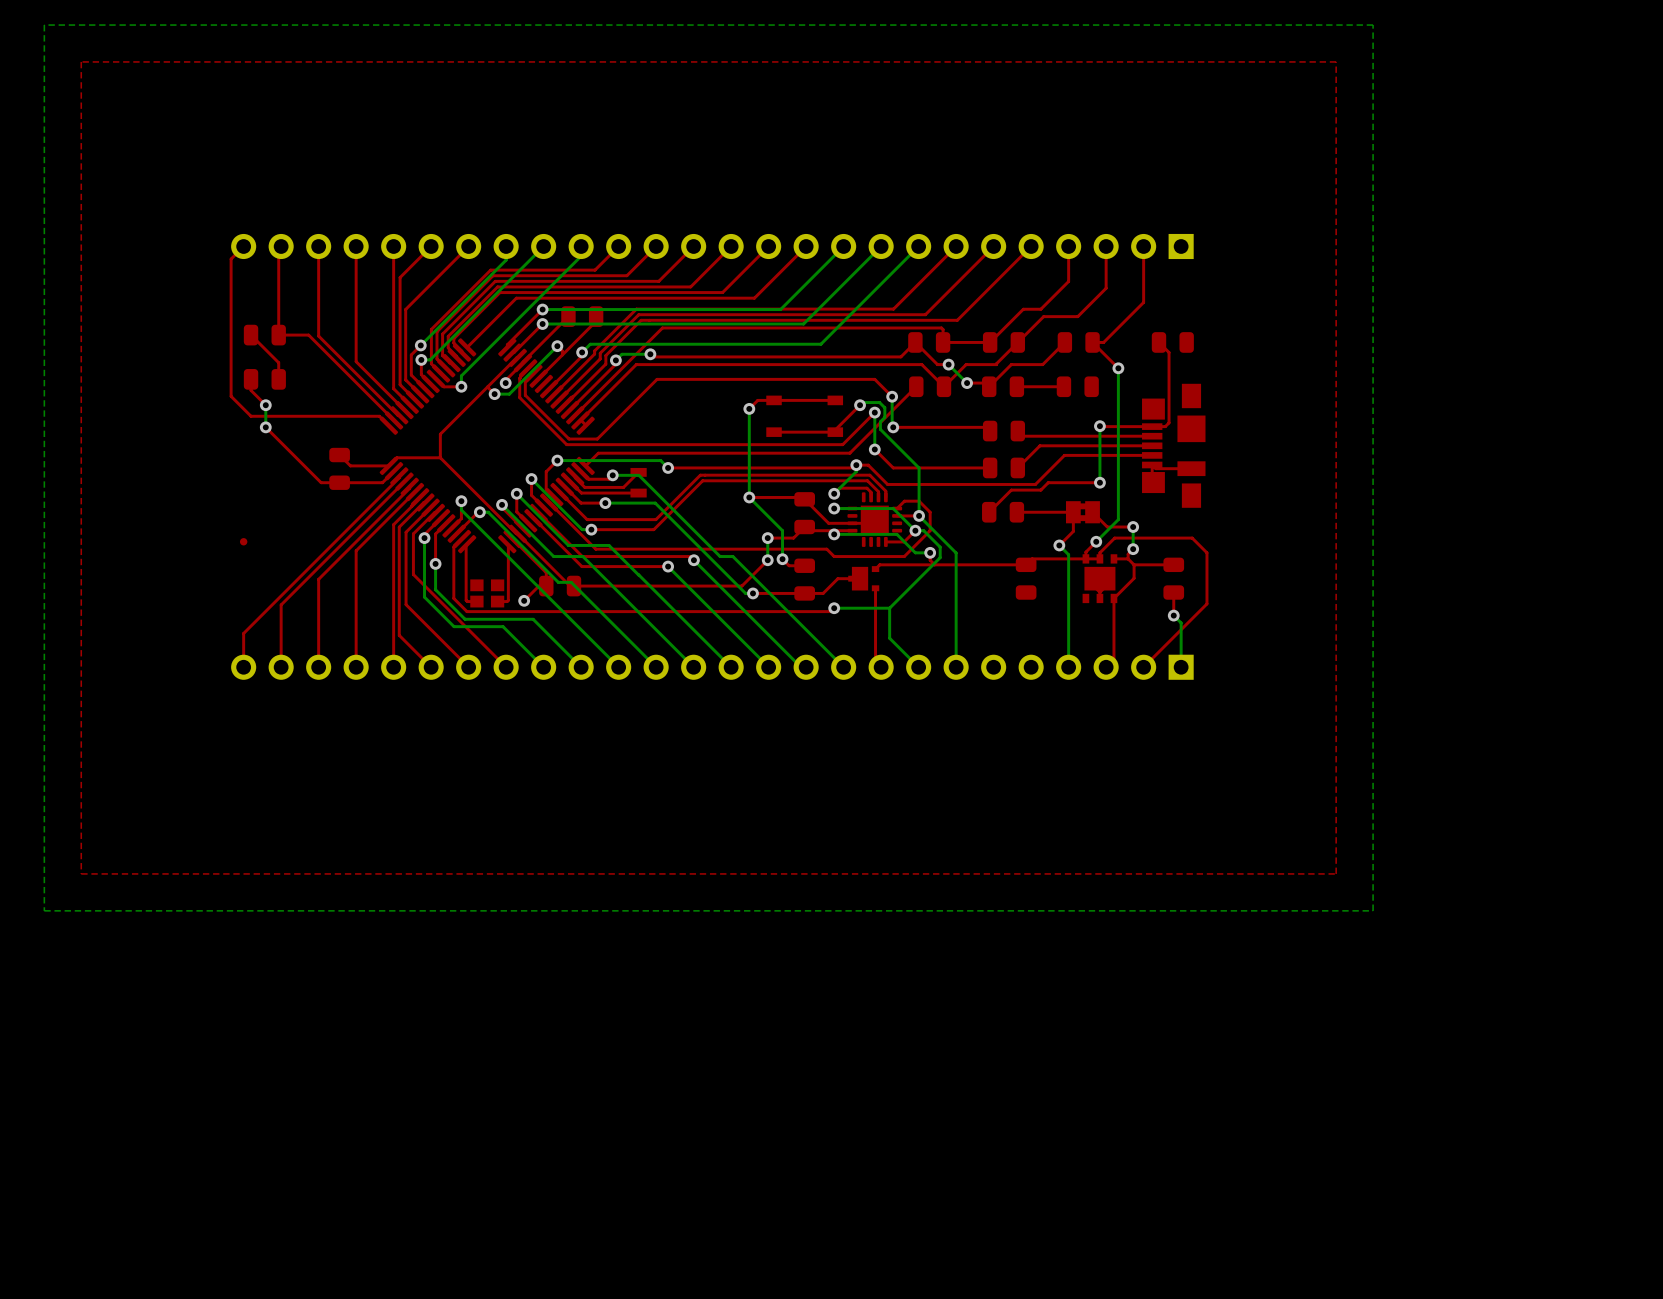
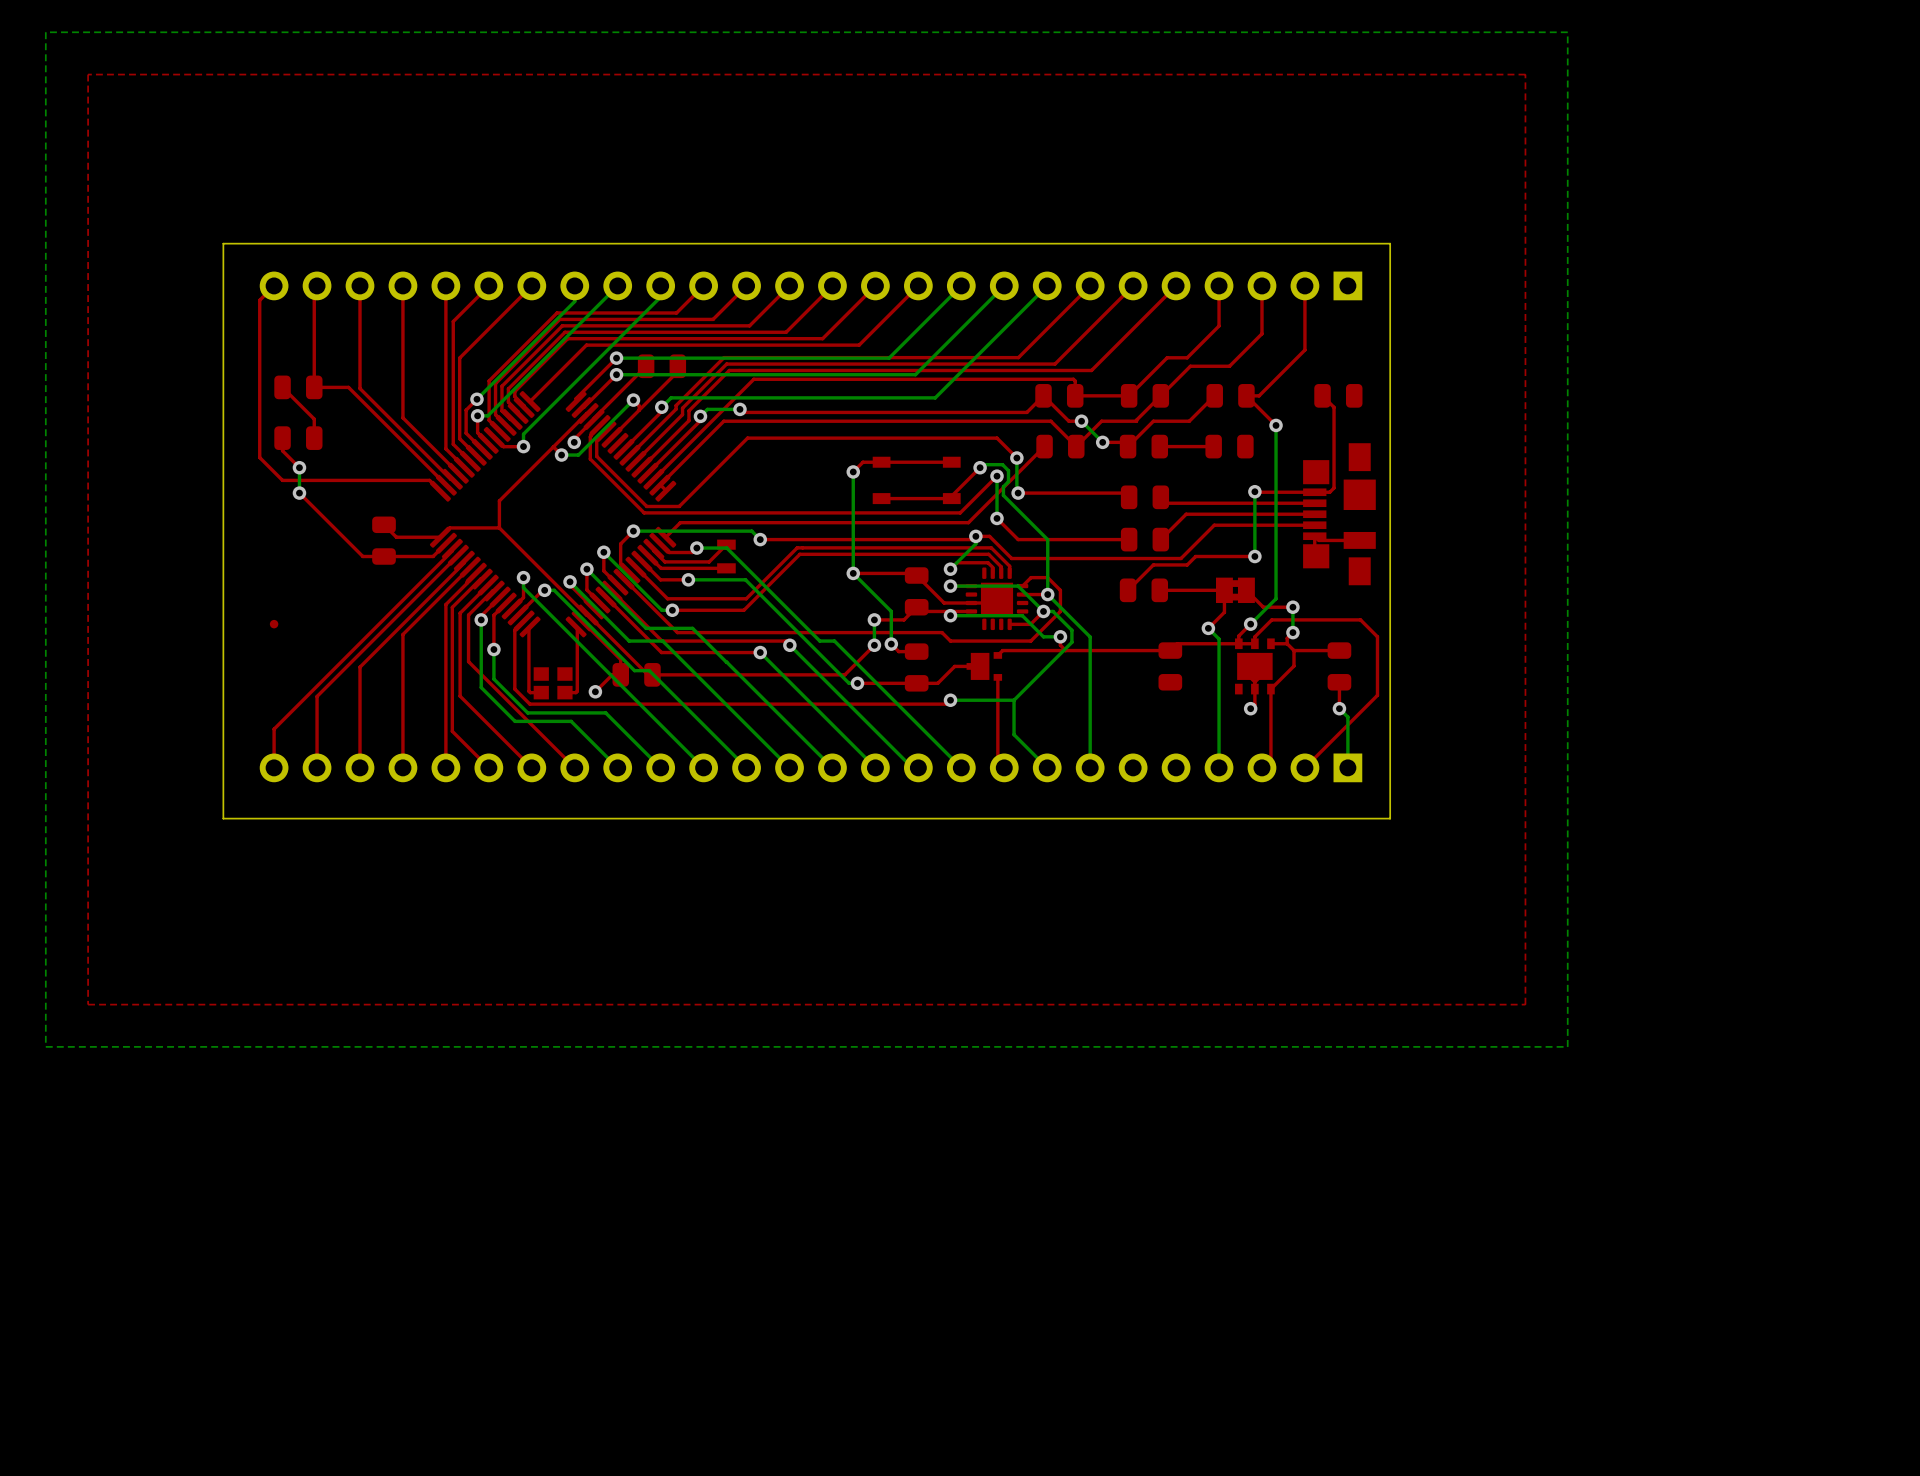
board edge: none -> (1390, 243) (1390, 818) (223, 818) (223, 243) (1390, 243)
top track: none -> (1254, 689) (1254, 704) (1250, 708)
via: none -> (1250, 708)

